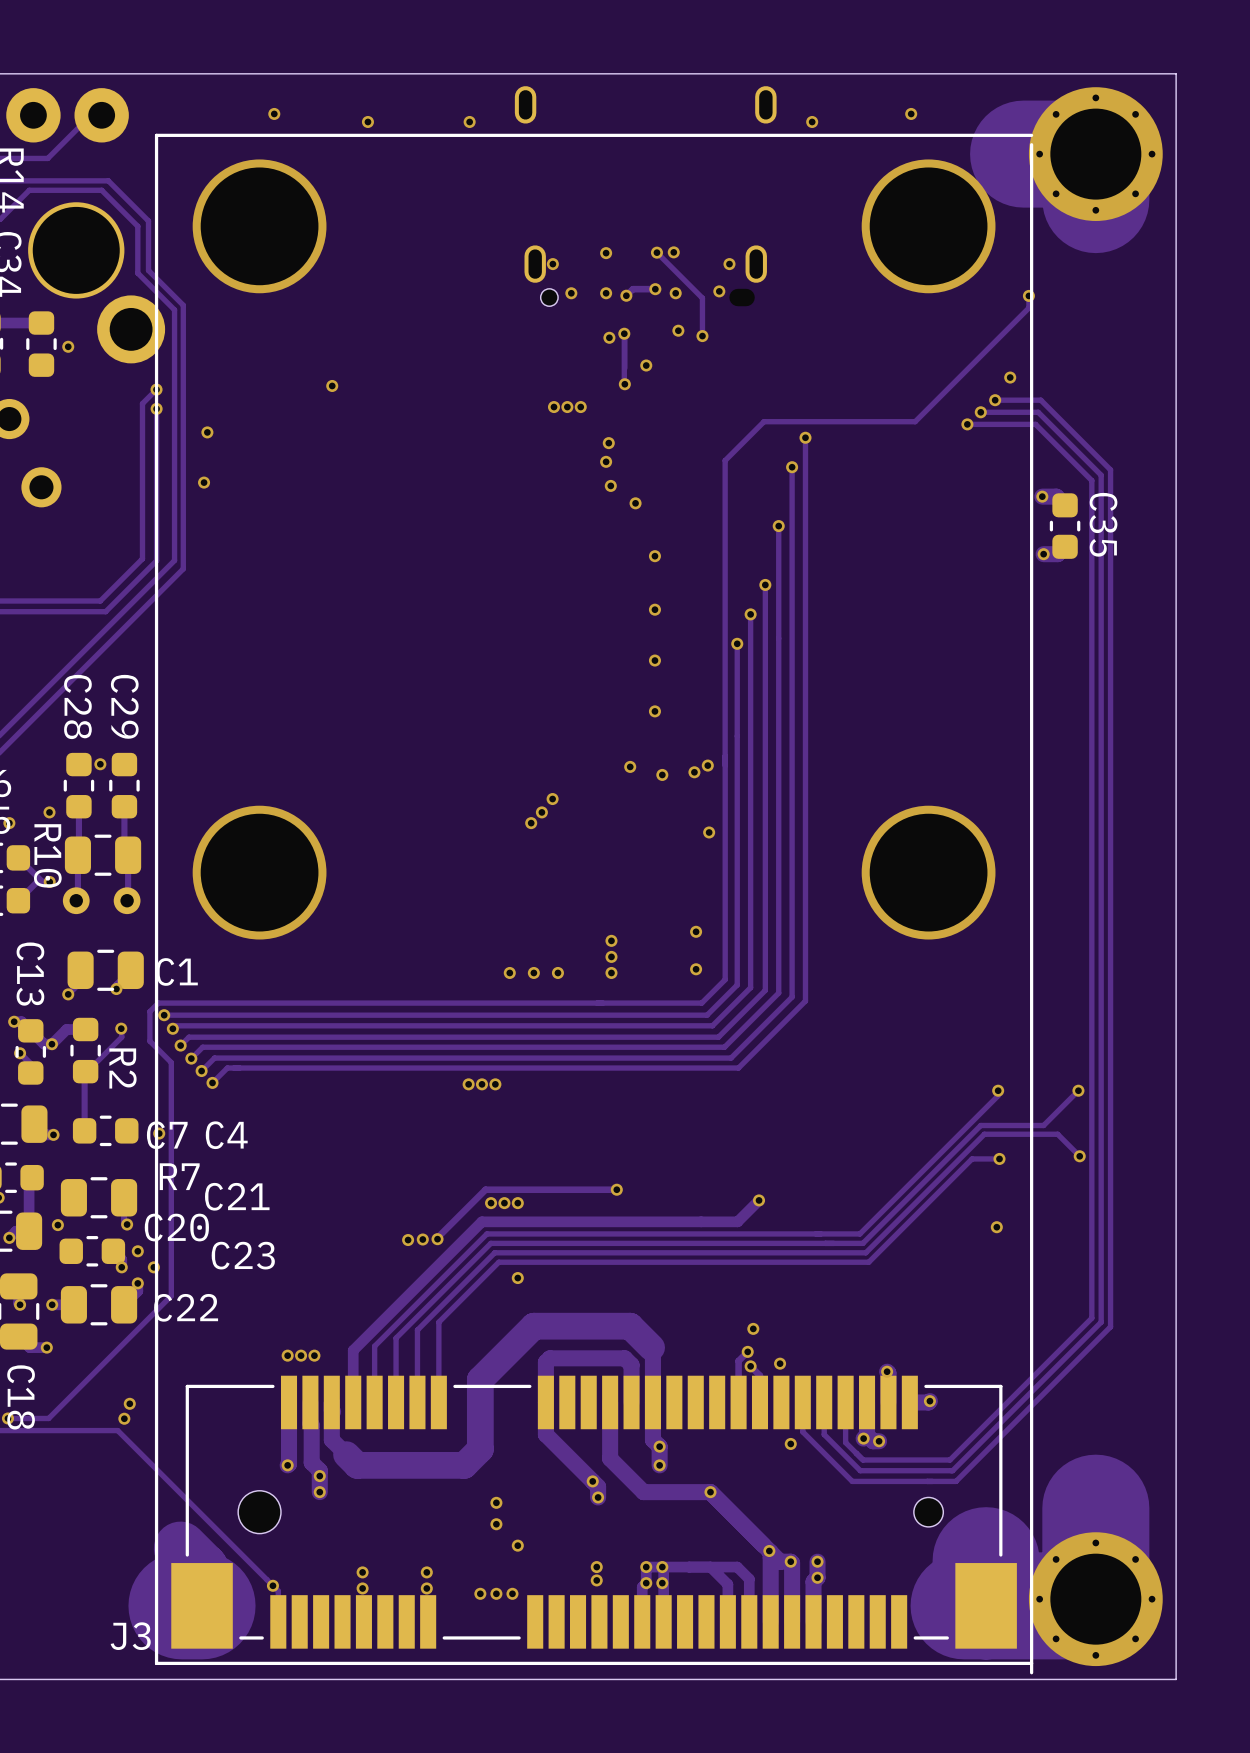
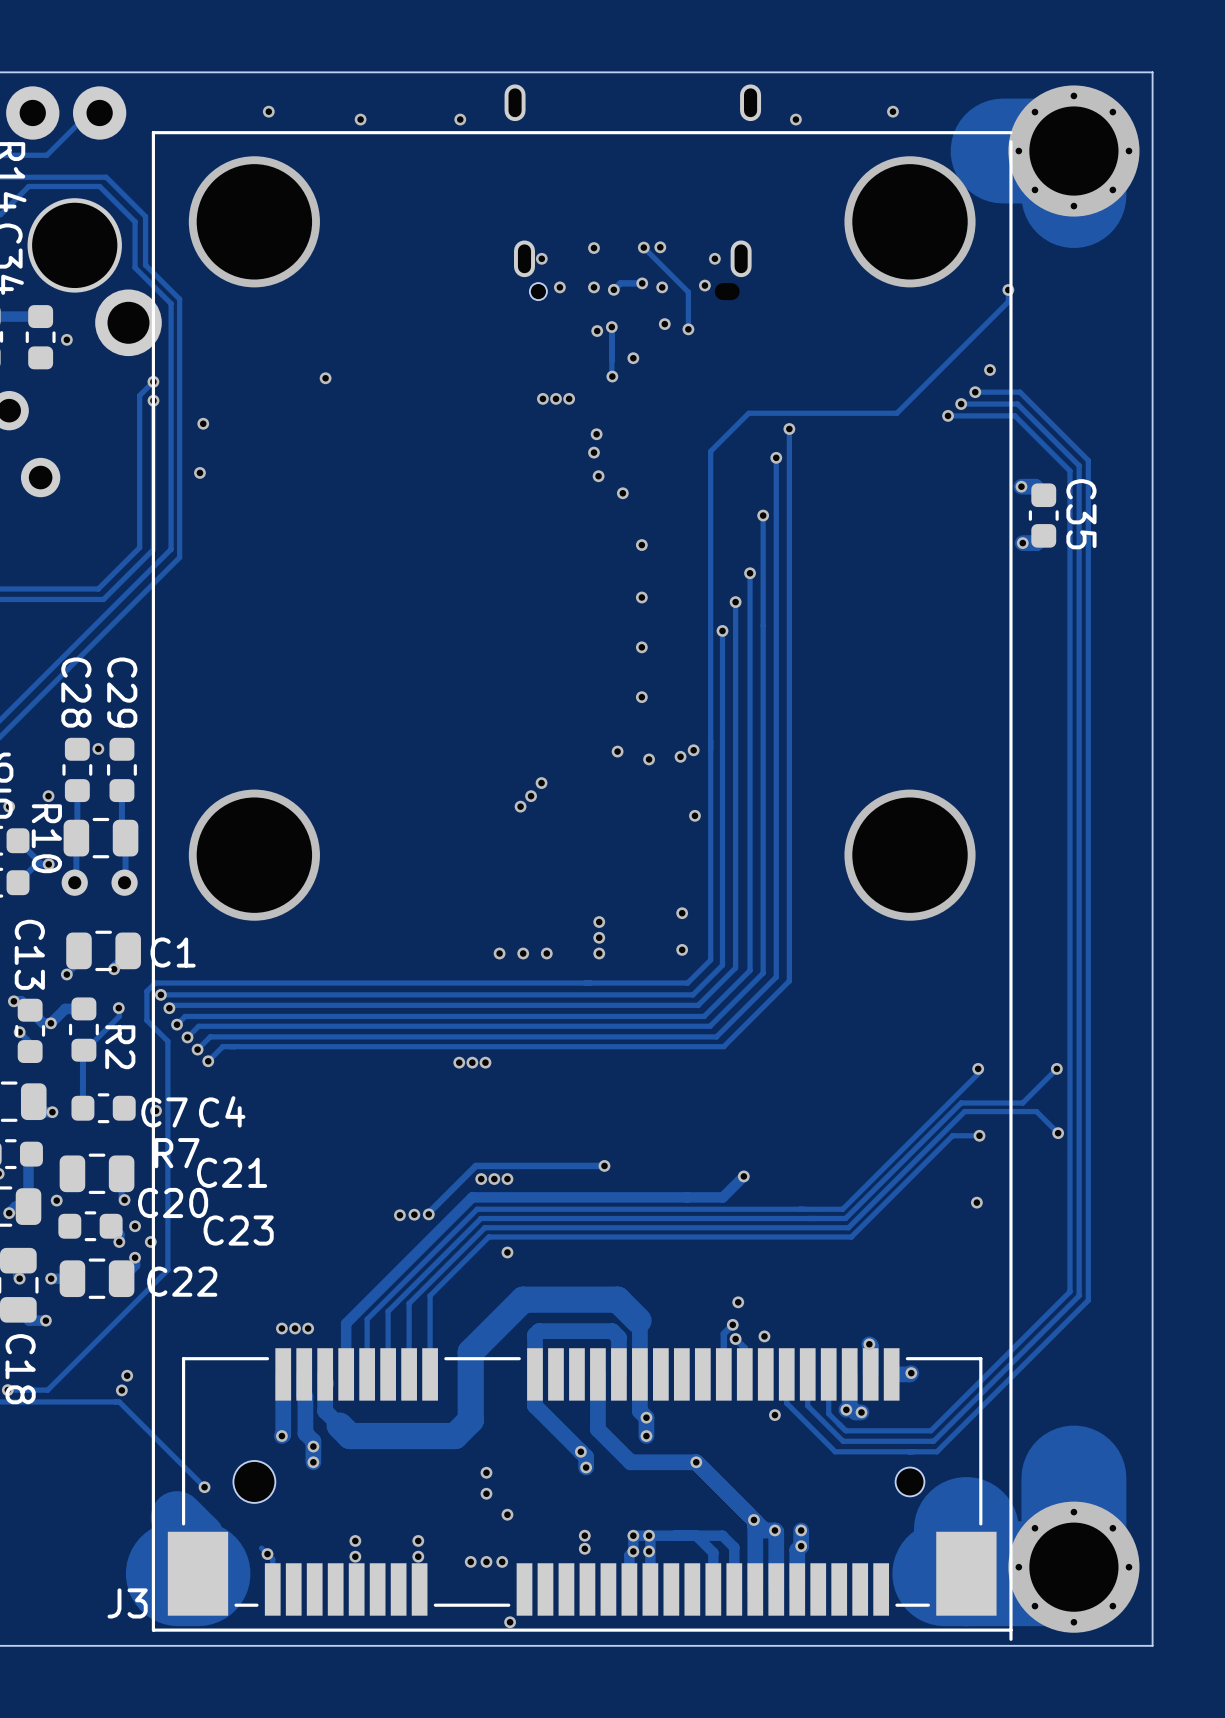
track: (117, 1430) (266, 1579) -> (115, 1401) (119, 1401) (204, 1487)
via: none -> (204, 1487)
via: none -> (510, 1622)

